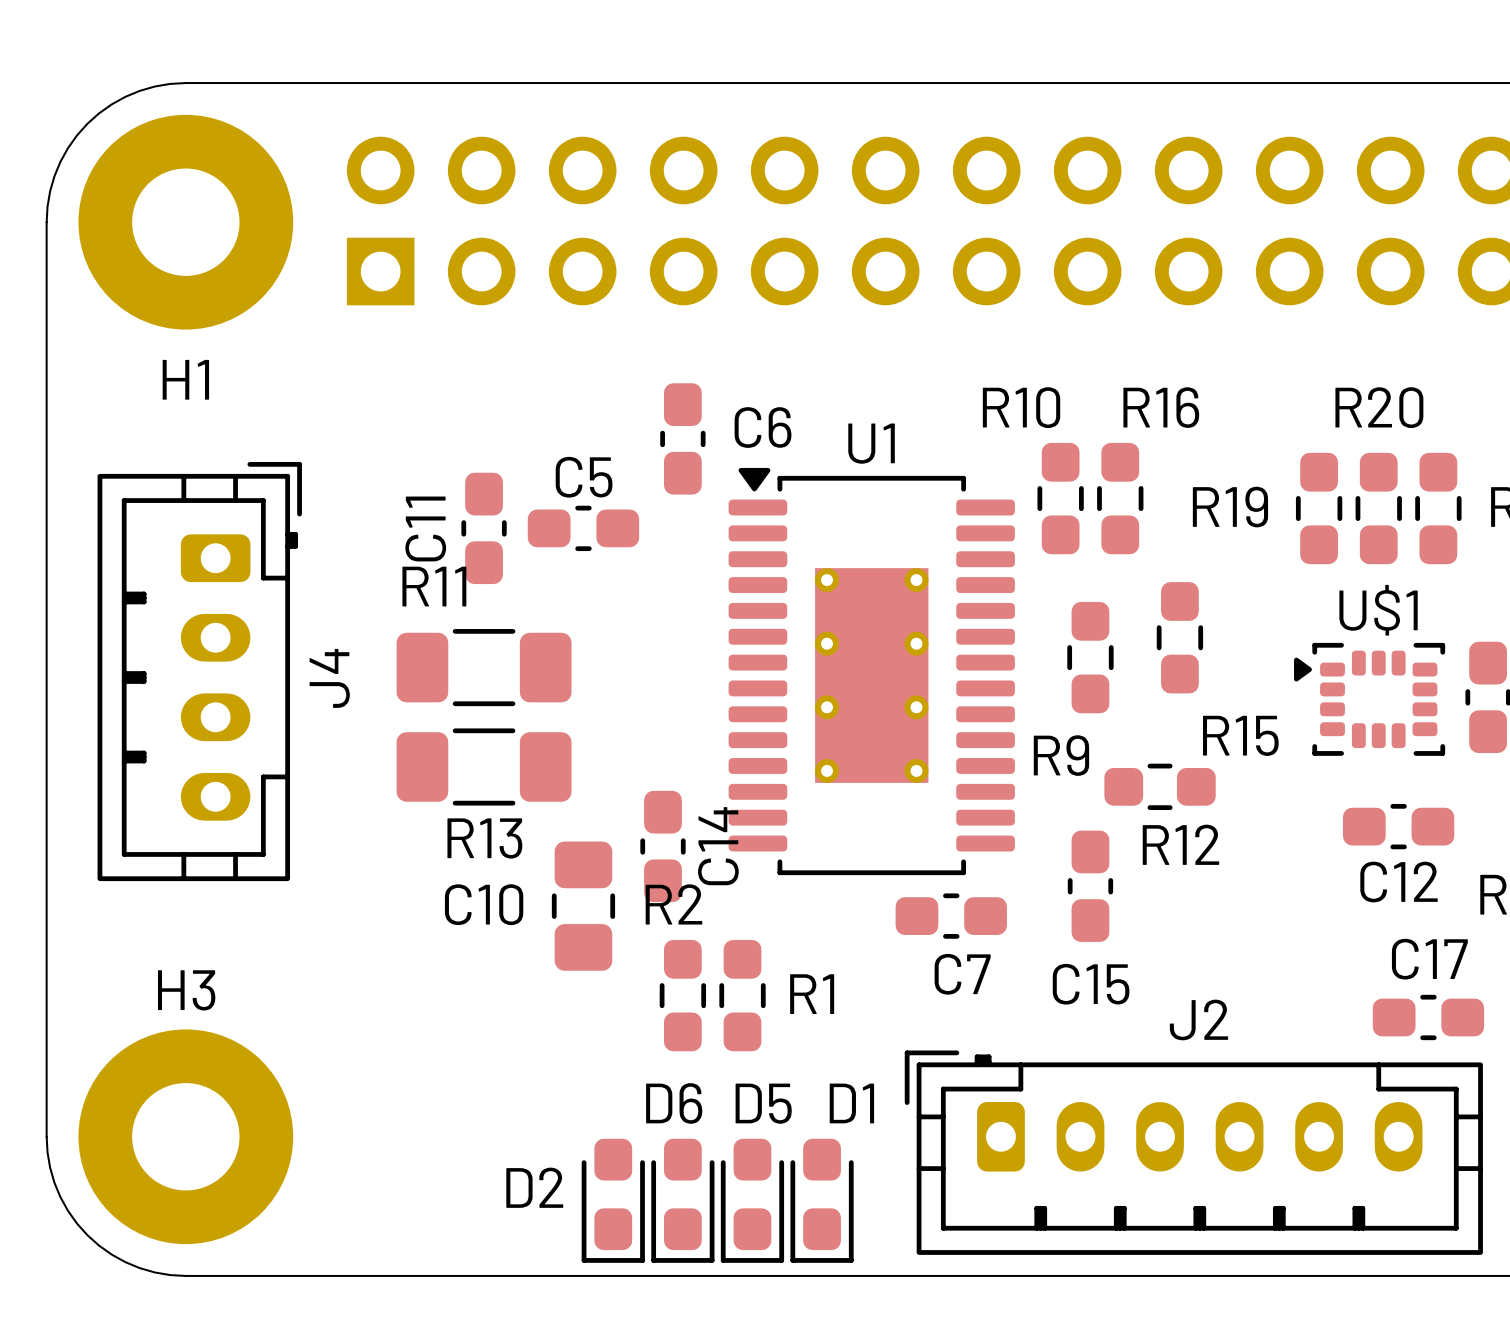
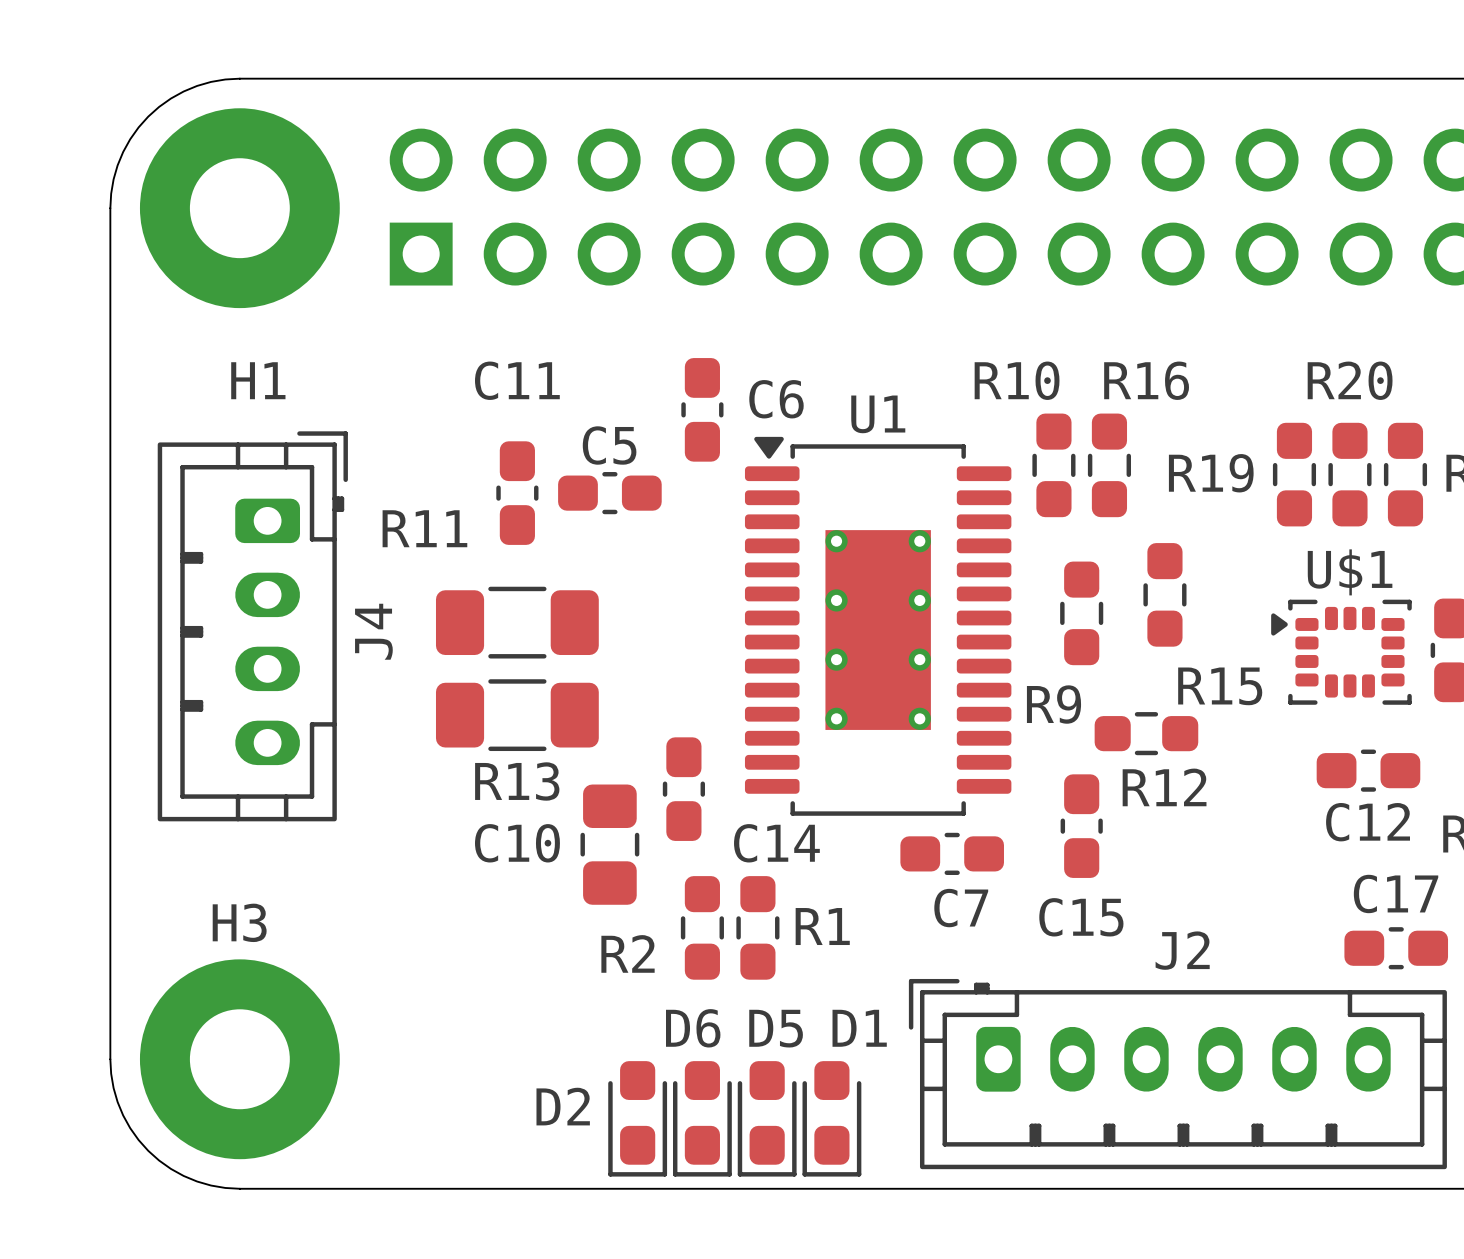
H1 name position: H1 (185, 379) -> H1 (258, 380)
C11 name rotation: 0° (425, 528) -> 90° clockwise (517, 380)
R11 name position: R11 (434, 586) -> R11 (424, 528)
C14 name rotation: 0° (718, 846) -> 90° clockwise (776, 843)
R2 name position: R2 (673, 904) -> R2 (628, 953)

